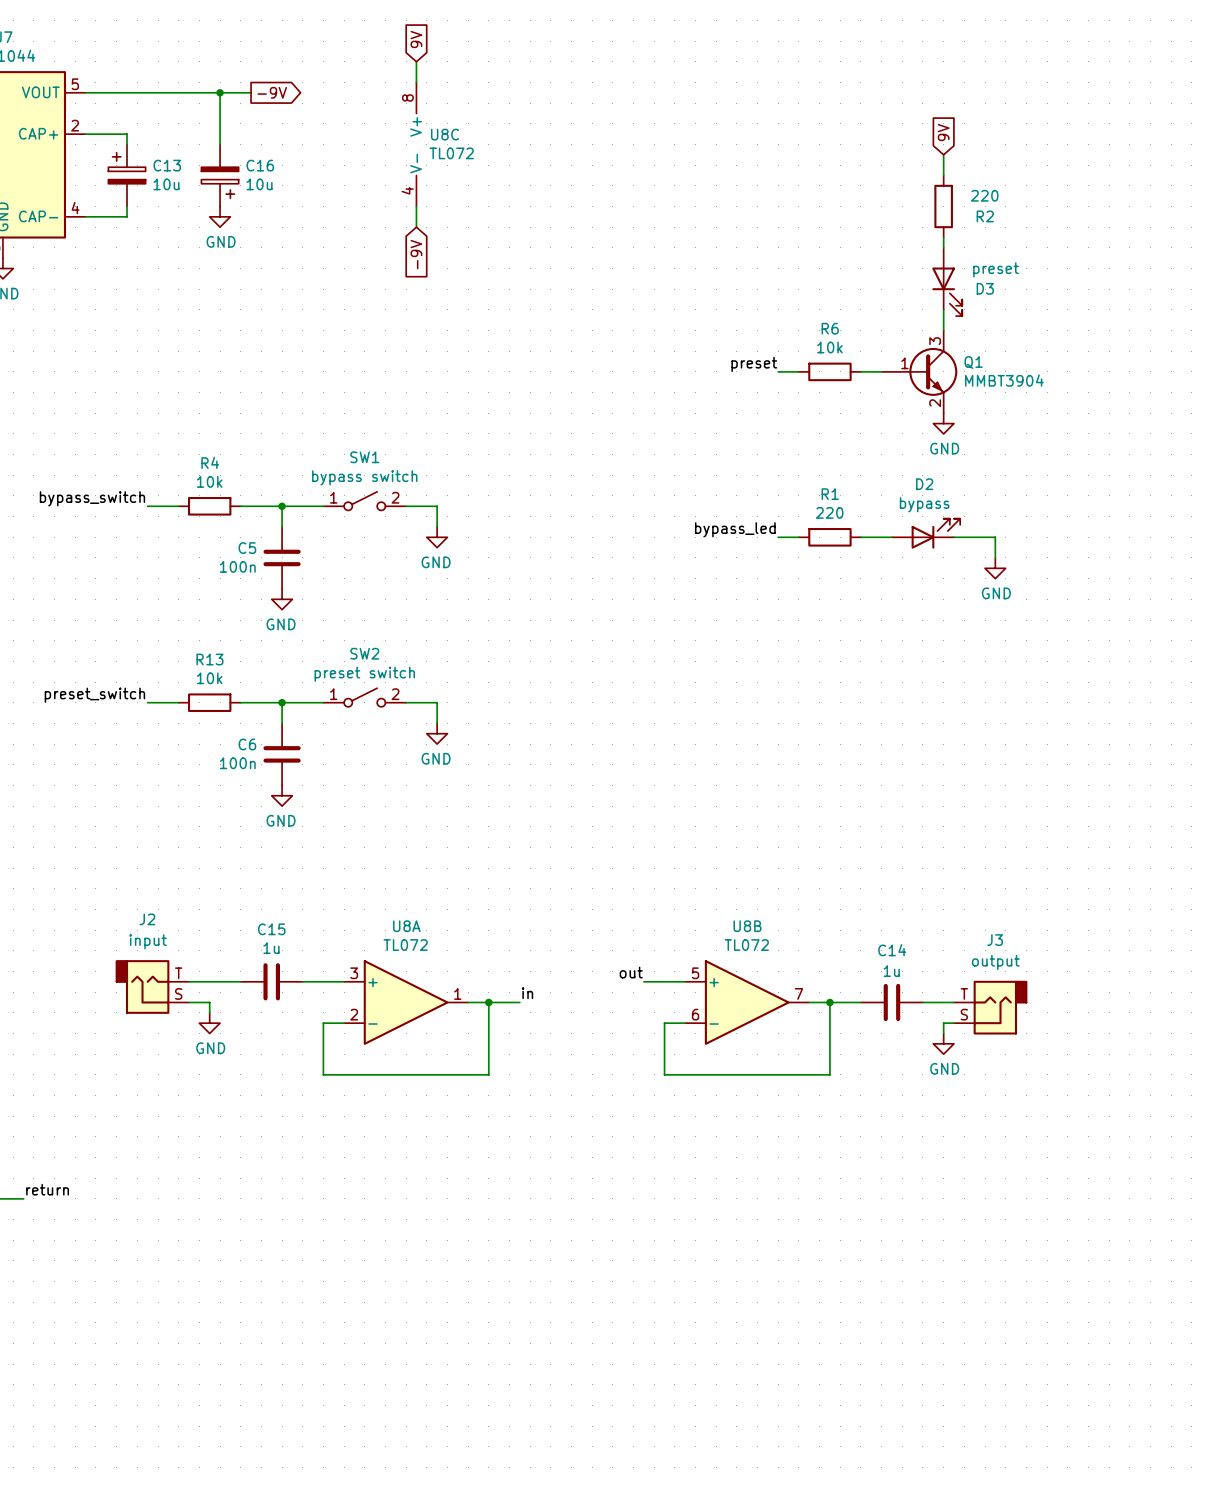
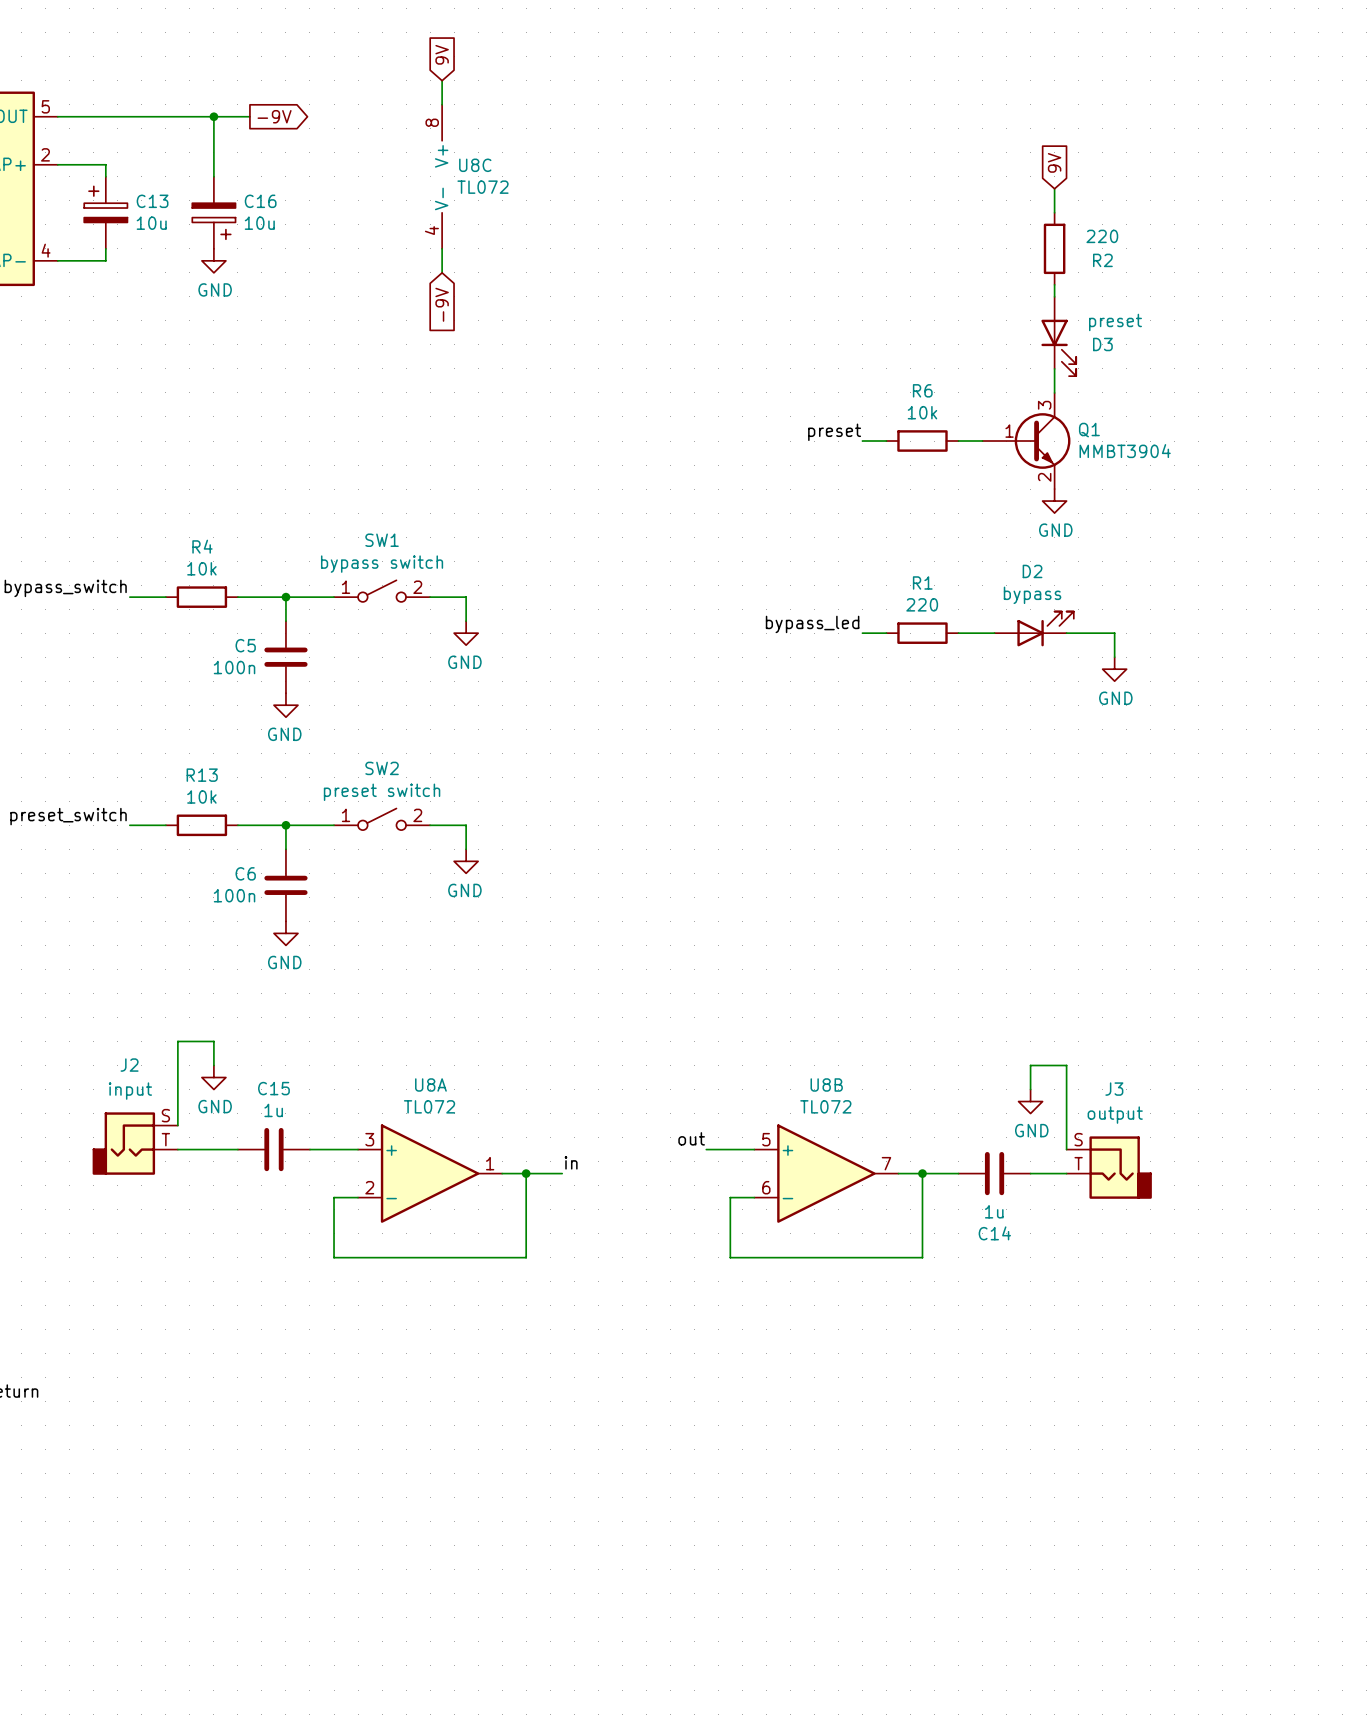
wire: none -> (213, 1065) (213, 1041) (177, 1041) (177, 1125)
wire: none -> (1030, 1089) (1030, 1065) (1066, 1065) (1066, 1149)
C14 name position: C14 (892, 950) -> C14 (994, 1233)
C14 value position: 1u (891, 971) -> 1u (994, 1211)
J2 flip: as is (142, 986) -> up-down (123, 1143)
wire: (189, 1002) (209, 1002) (209, 1012) -> none
J3 flip: as is (1000, 1007) -> up-down (1120, 1167)
power symbol position: GND (209, 1023) -> GND (213, 1077)
wire: (953, 1023) (943, 1023) (943, 1033) -> none
power symbol position: GND (943, 1043) -> GND (1030, 1101)

